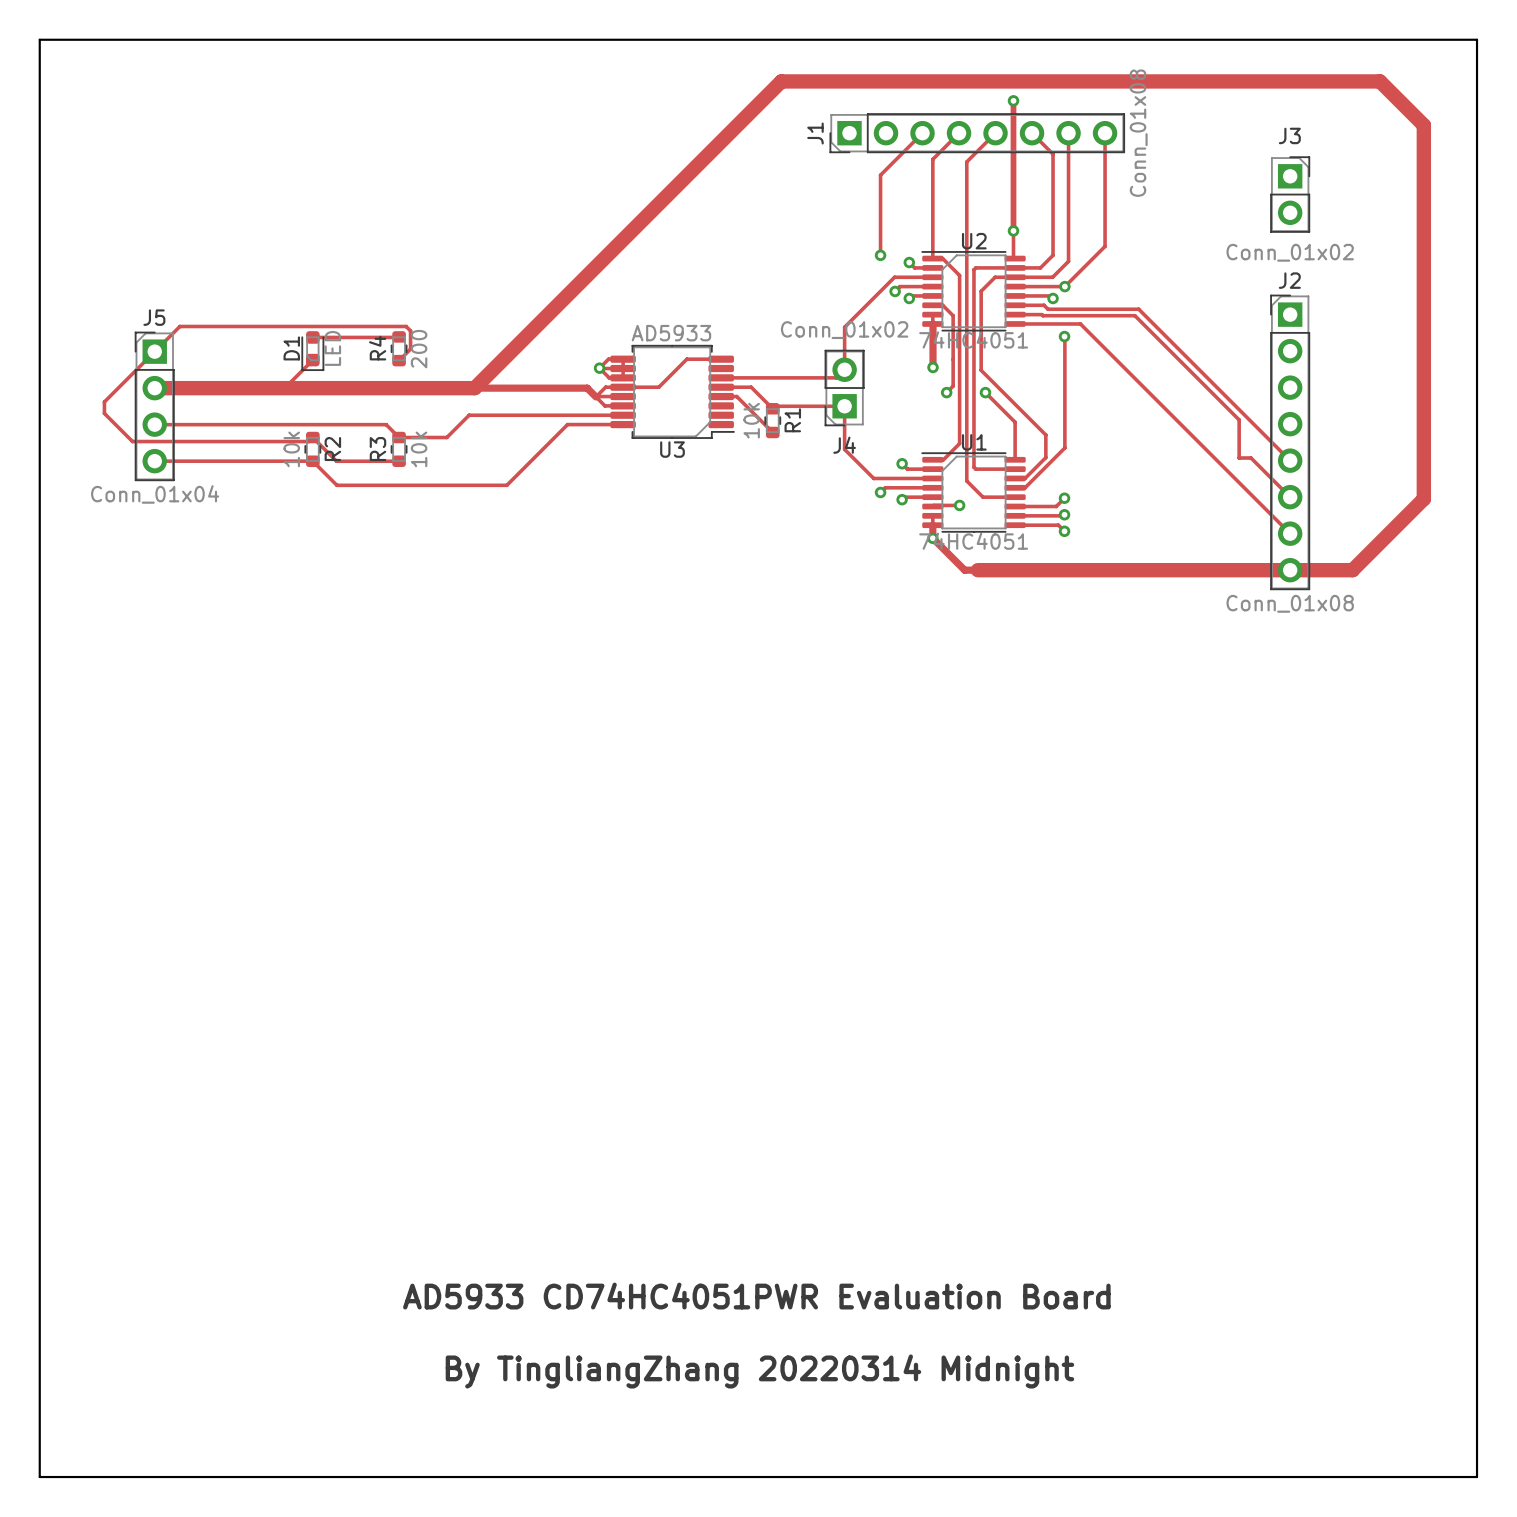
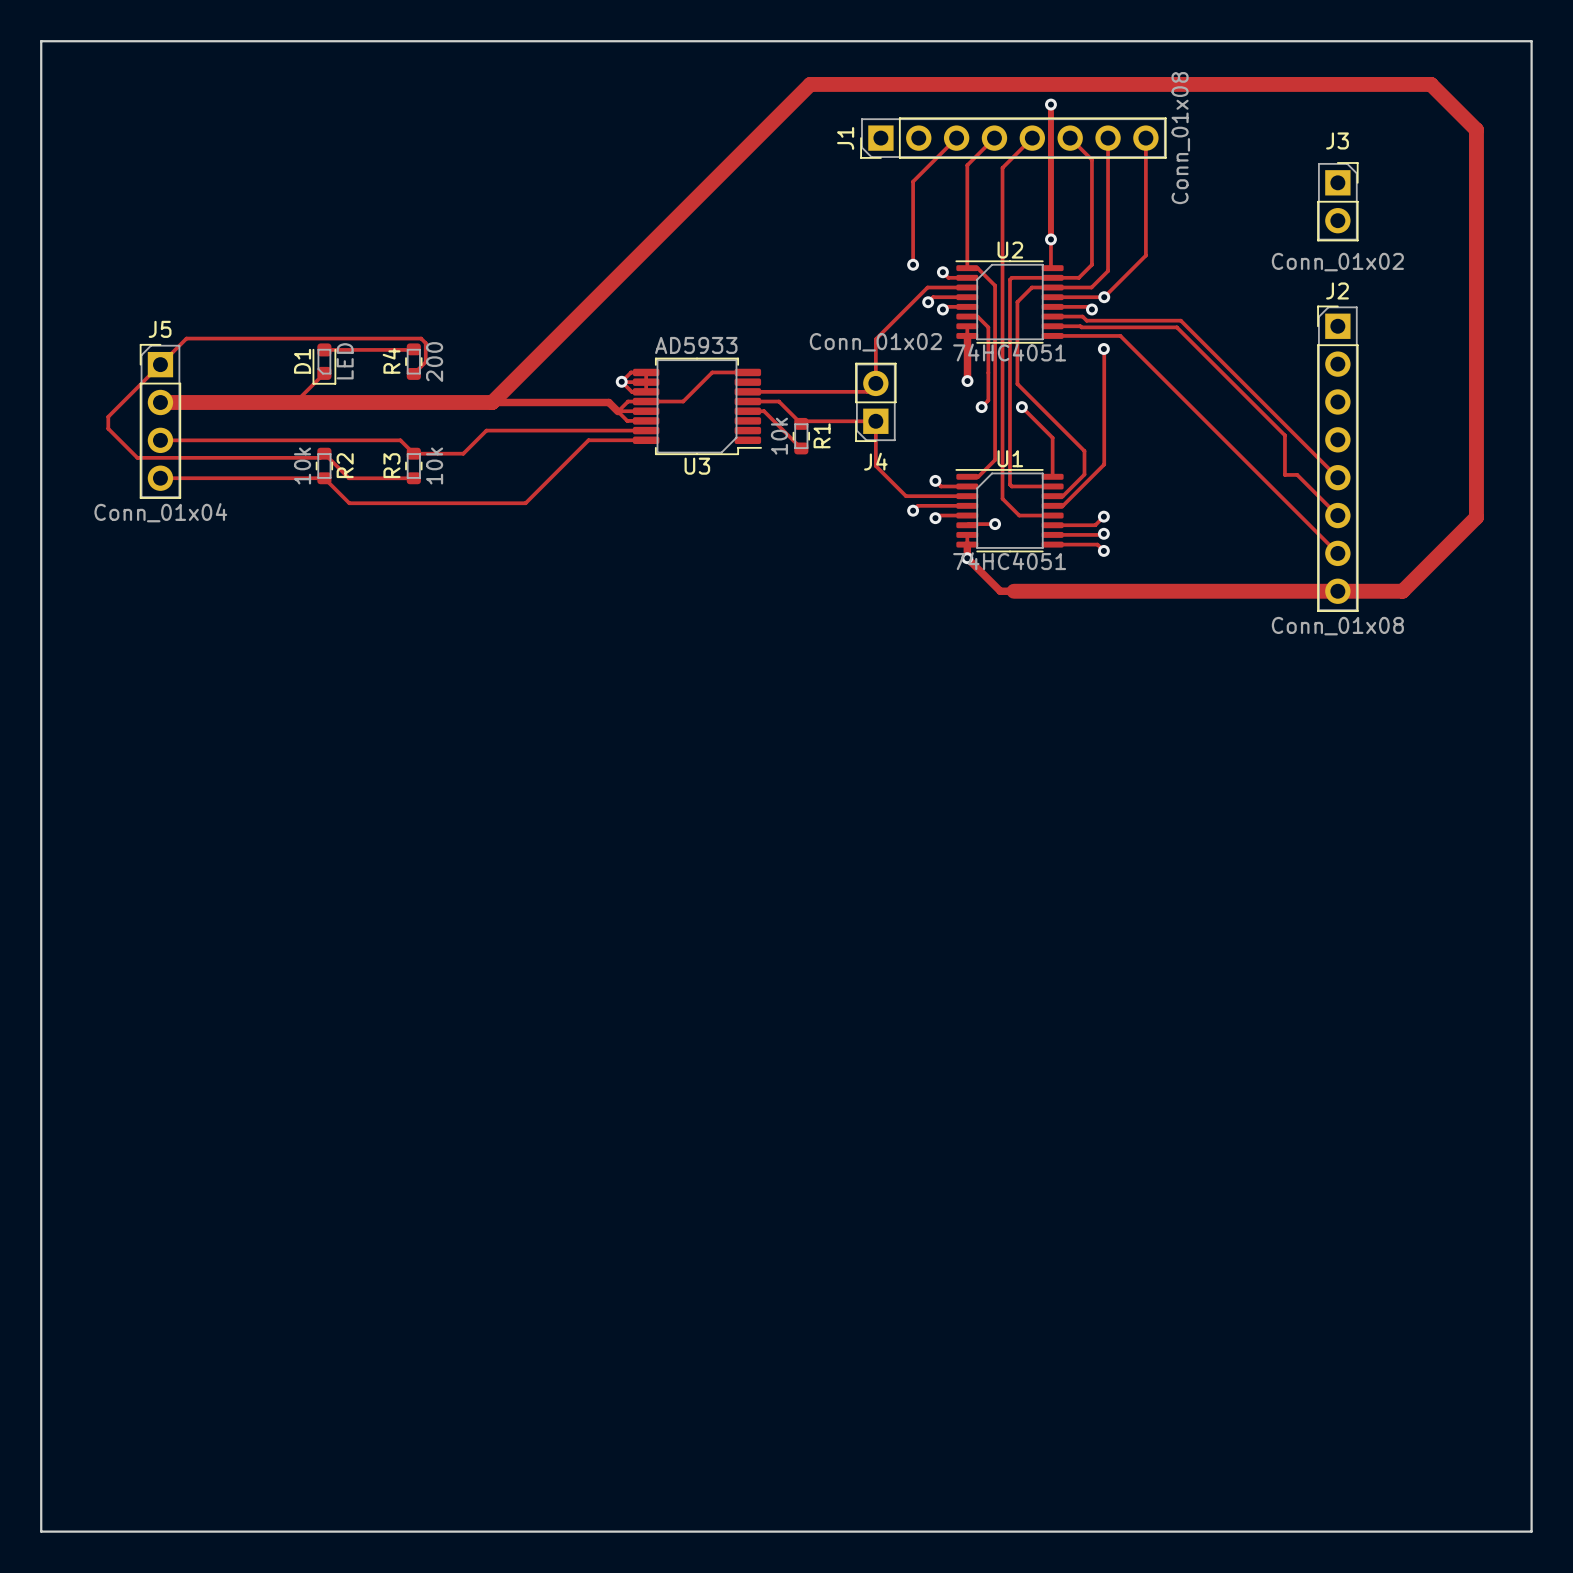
text: AD5933 CD74HC4051PWR Evaluation Board (756, 1296) -> none
text: By TingliangZhang 20220314 Midnight (759, 1371) -> none

